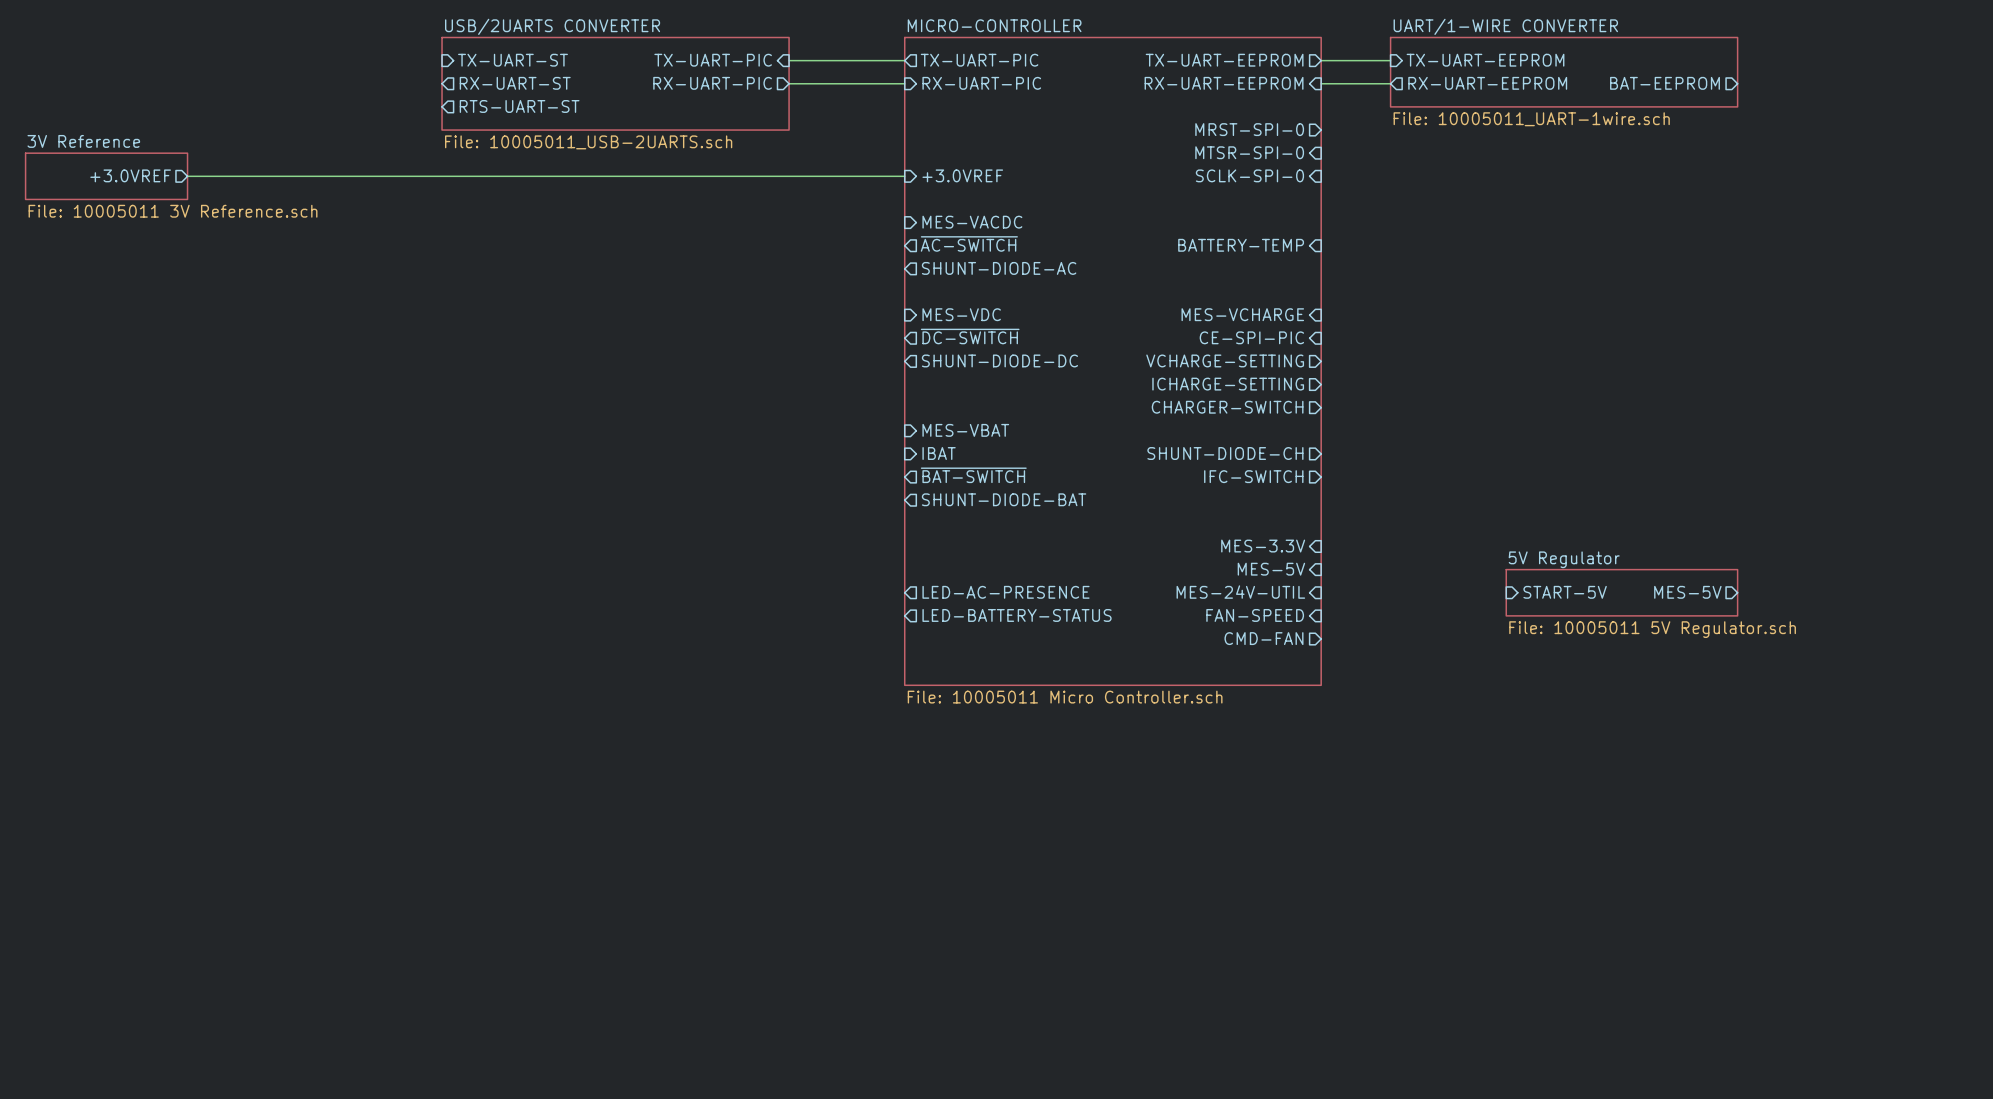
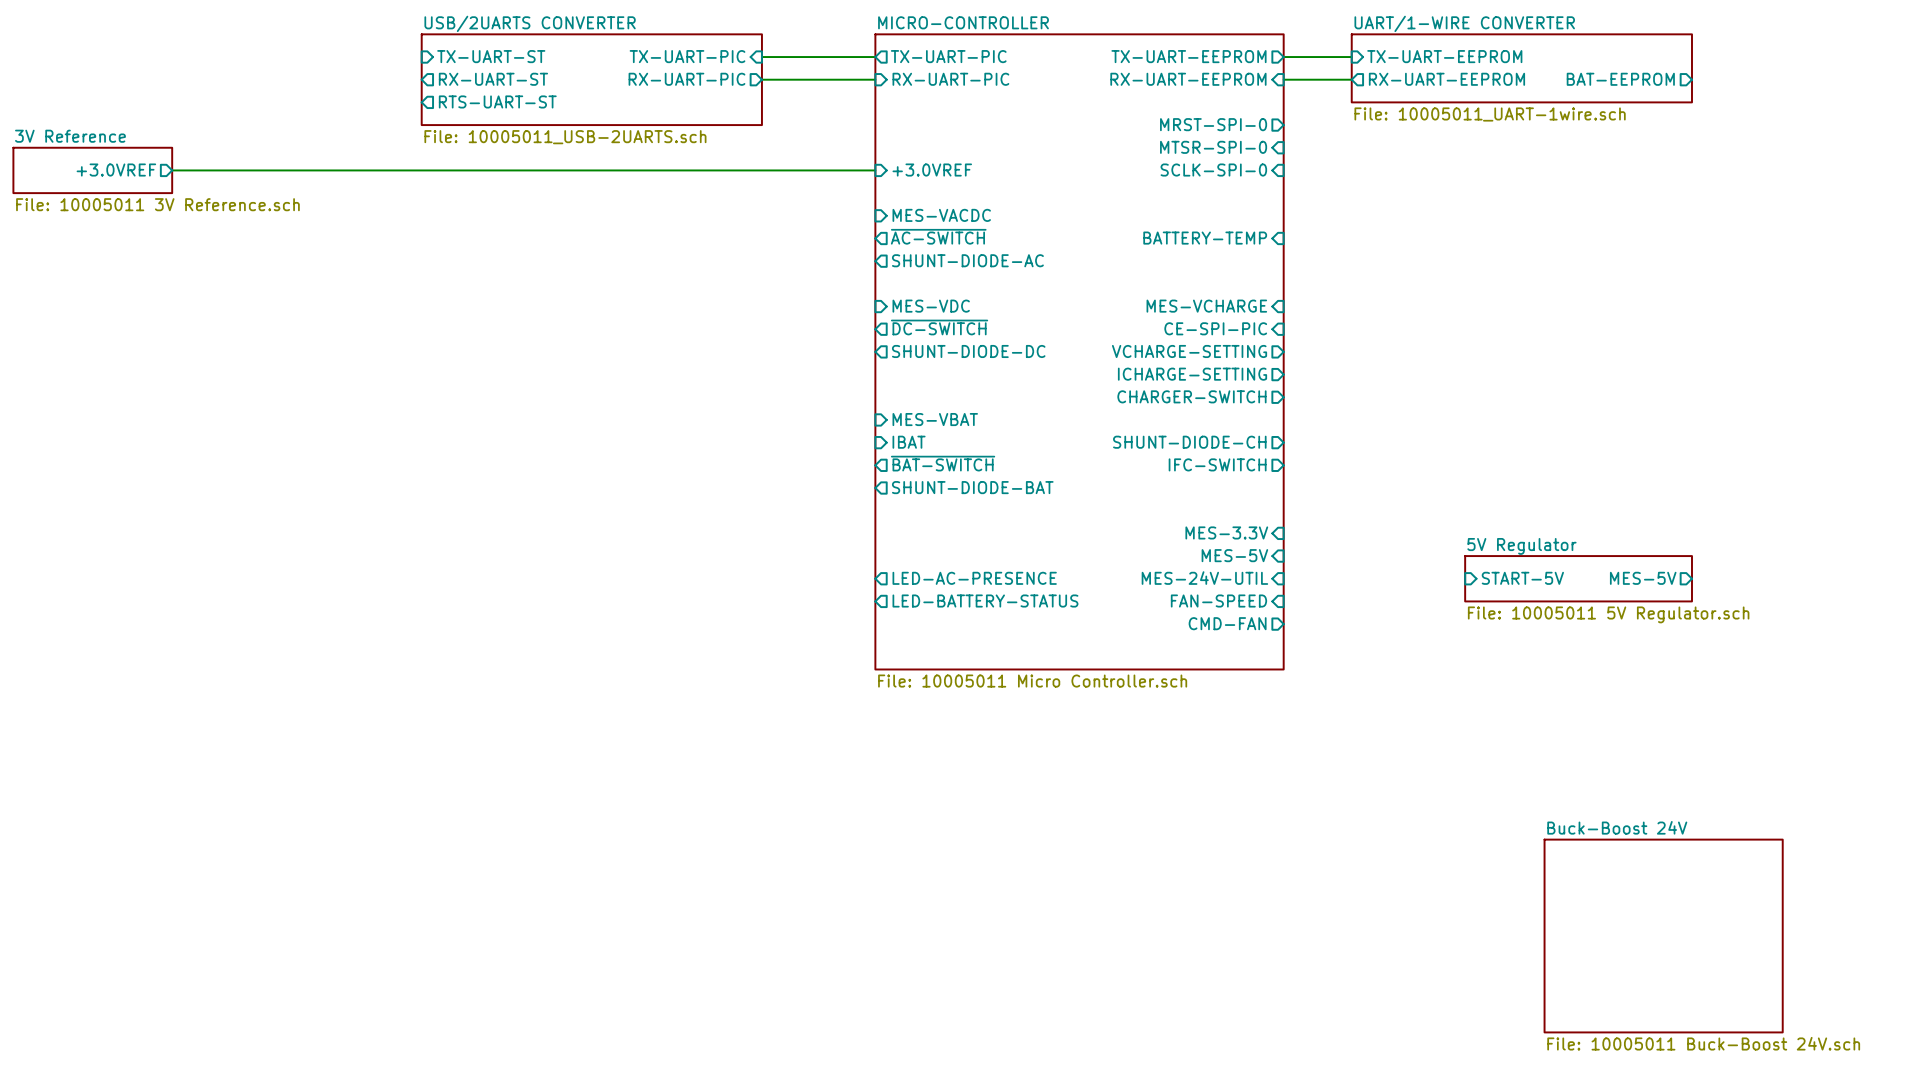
sheet Buck-Boost 24V: none -> File: 10005011 Buck-Boost 24V.sch (1663, 936)

